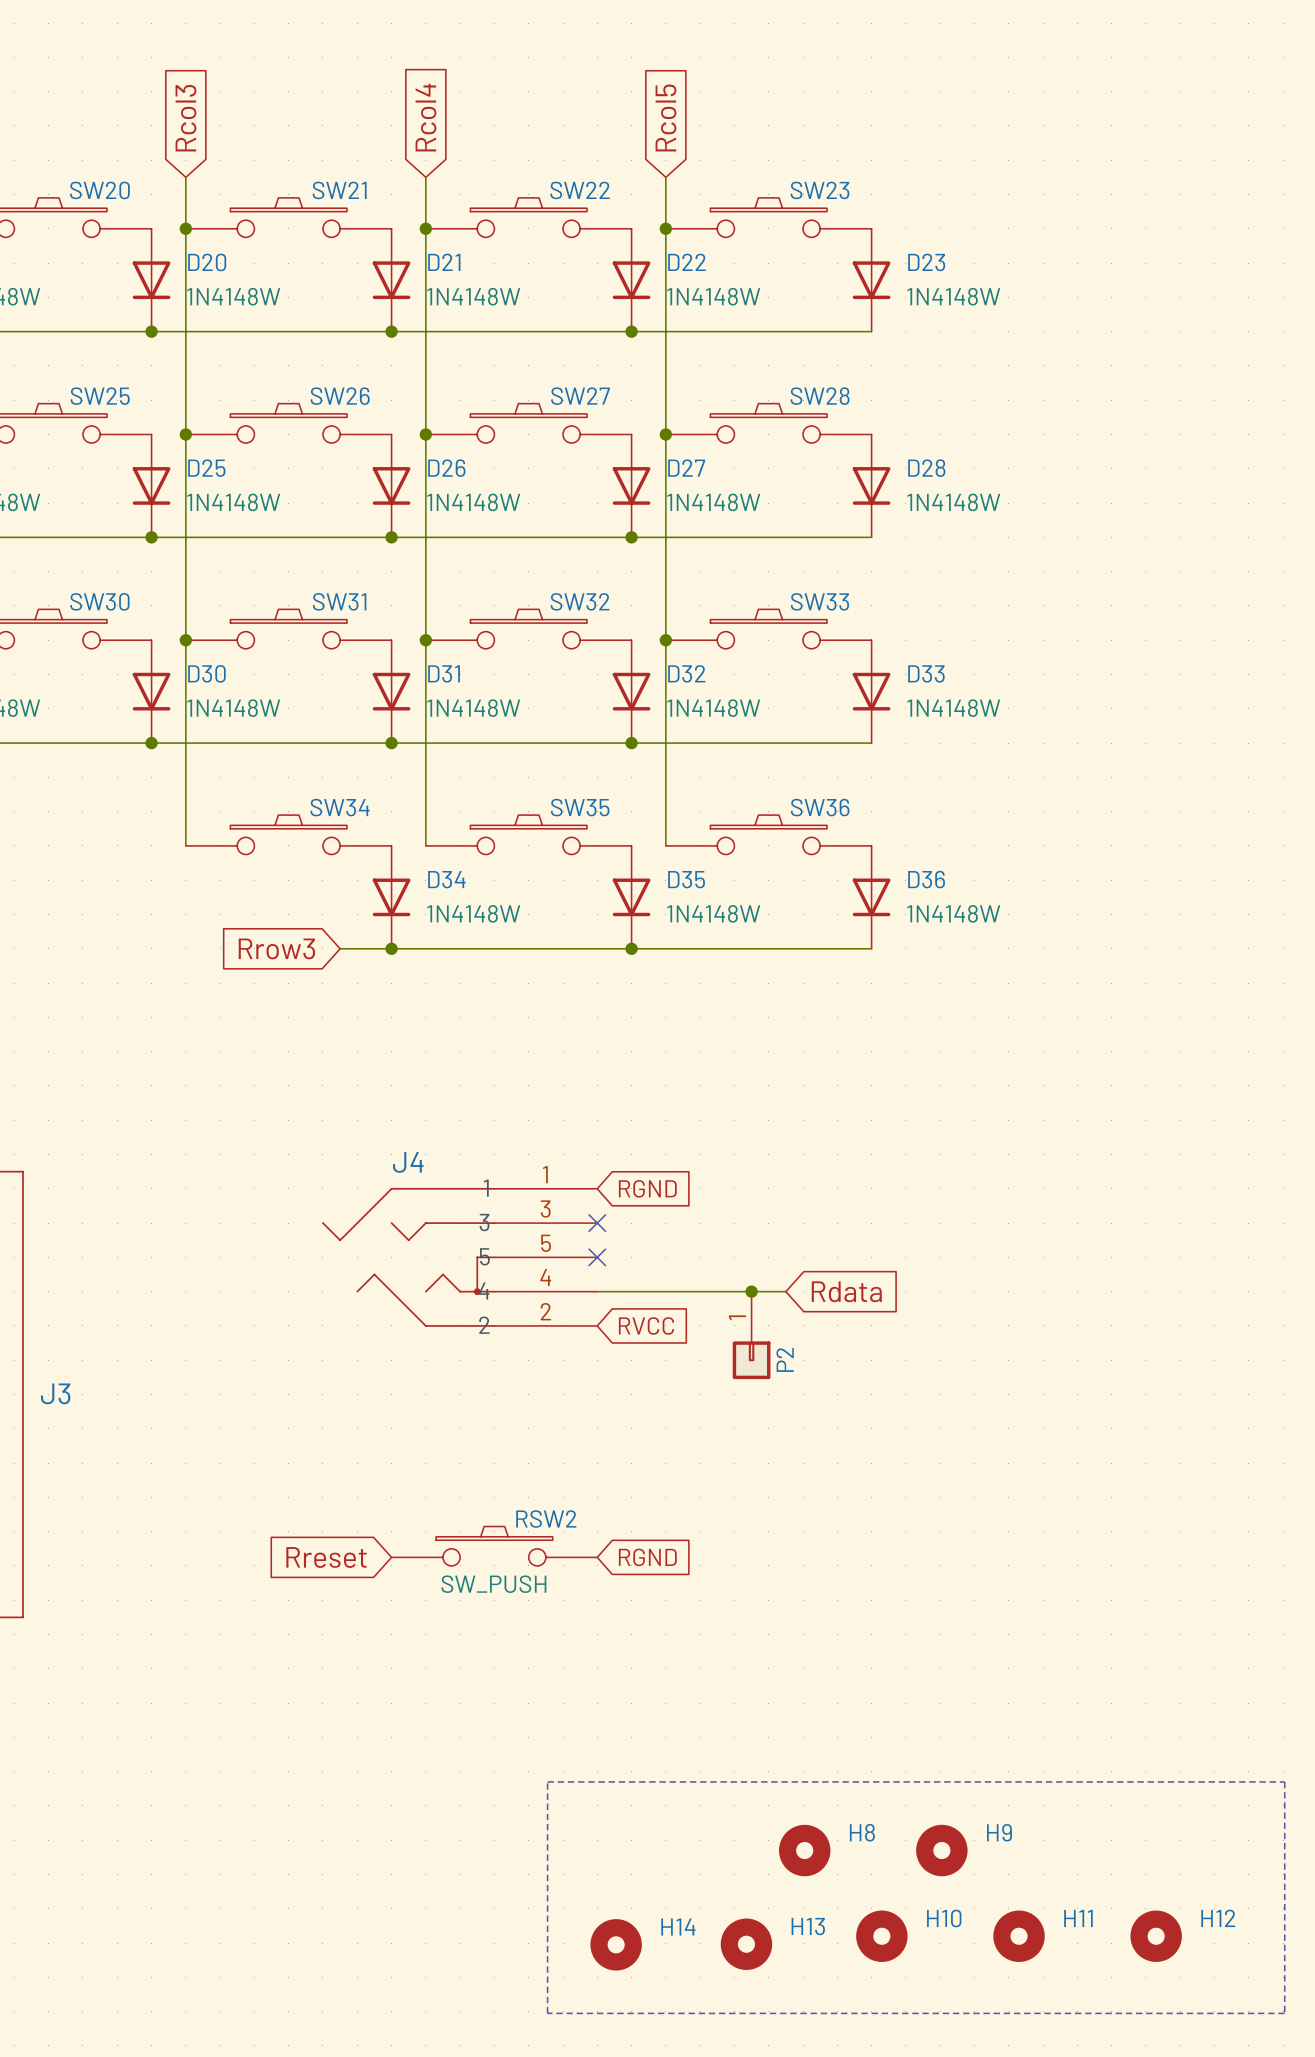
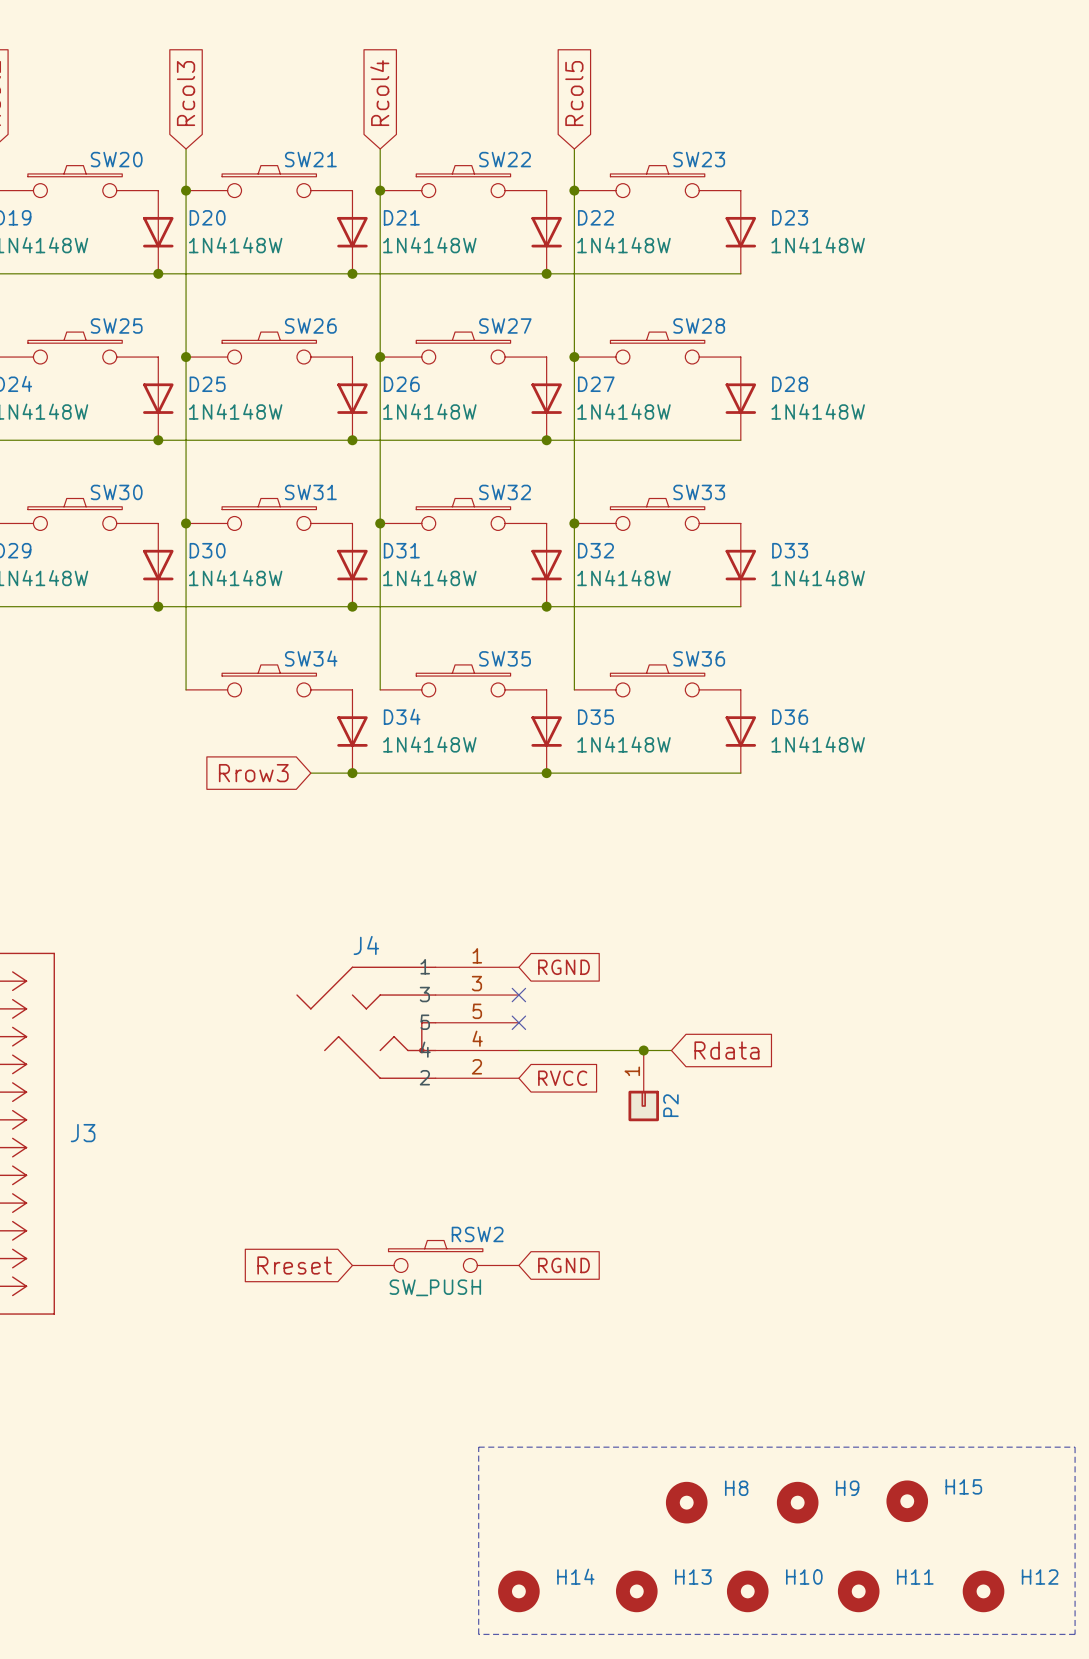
H15: none -> (907, 1501)
H10 position: (881, 1936) -> (747, 1591)
H11 position: (1019, 1936) -> (858, 1591)
H12 position: (1156, 1936) -> (983, 1591)
H14 position: (616, 1944) -> (518, 1591)
H13 position: (746, 1944) -> (636, 1591)

